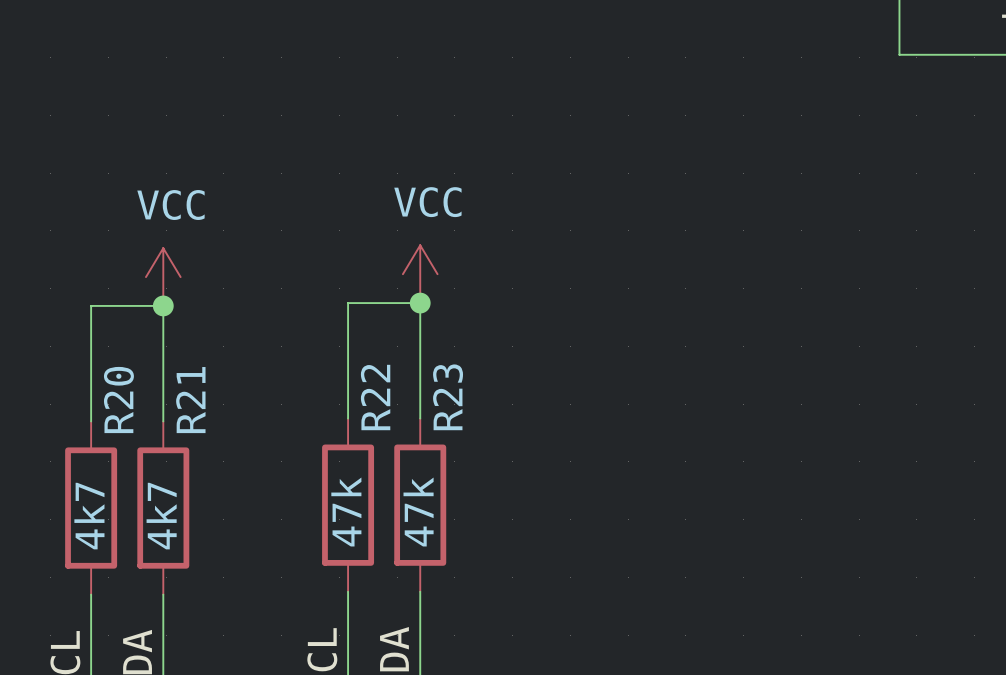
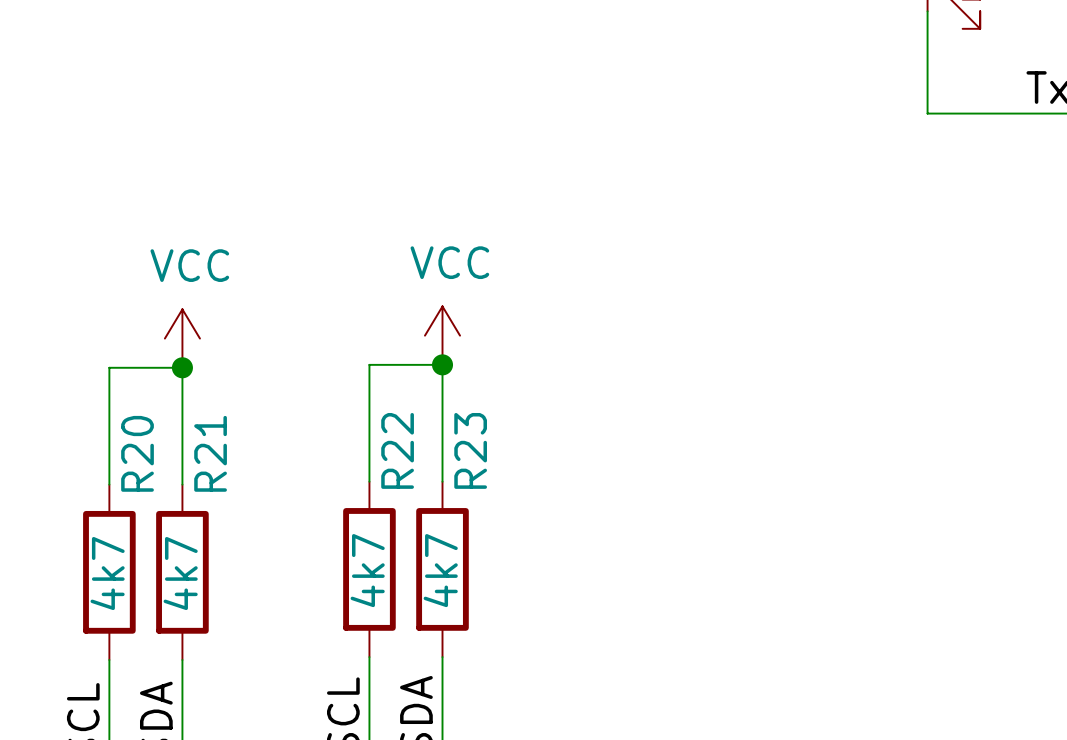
R22 value: 47k (346, 512) -> 4k7 (367, 570)
R23 value: 47k (418, 512) -> 4k7 (440, 570)

